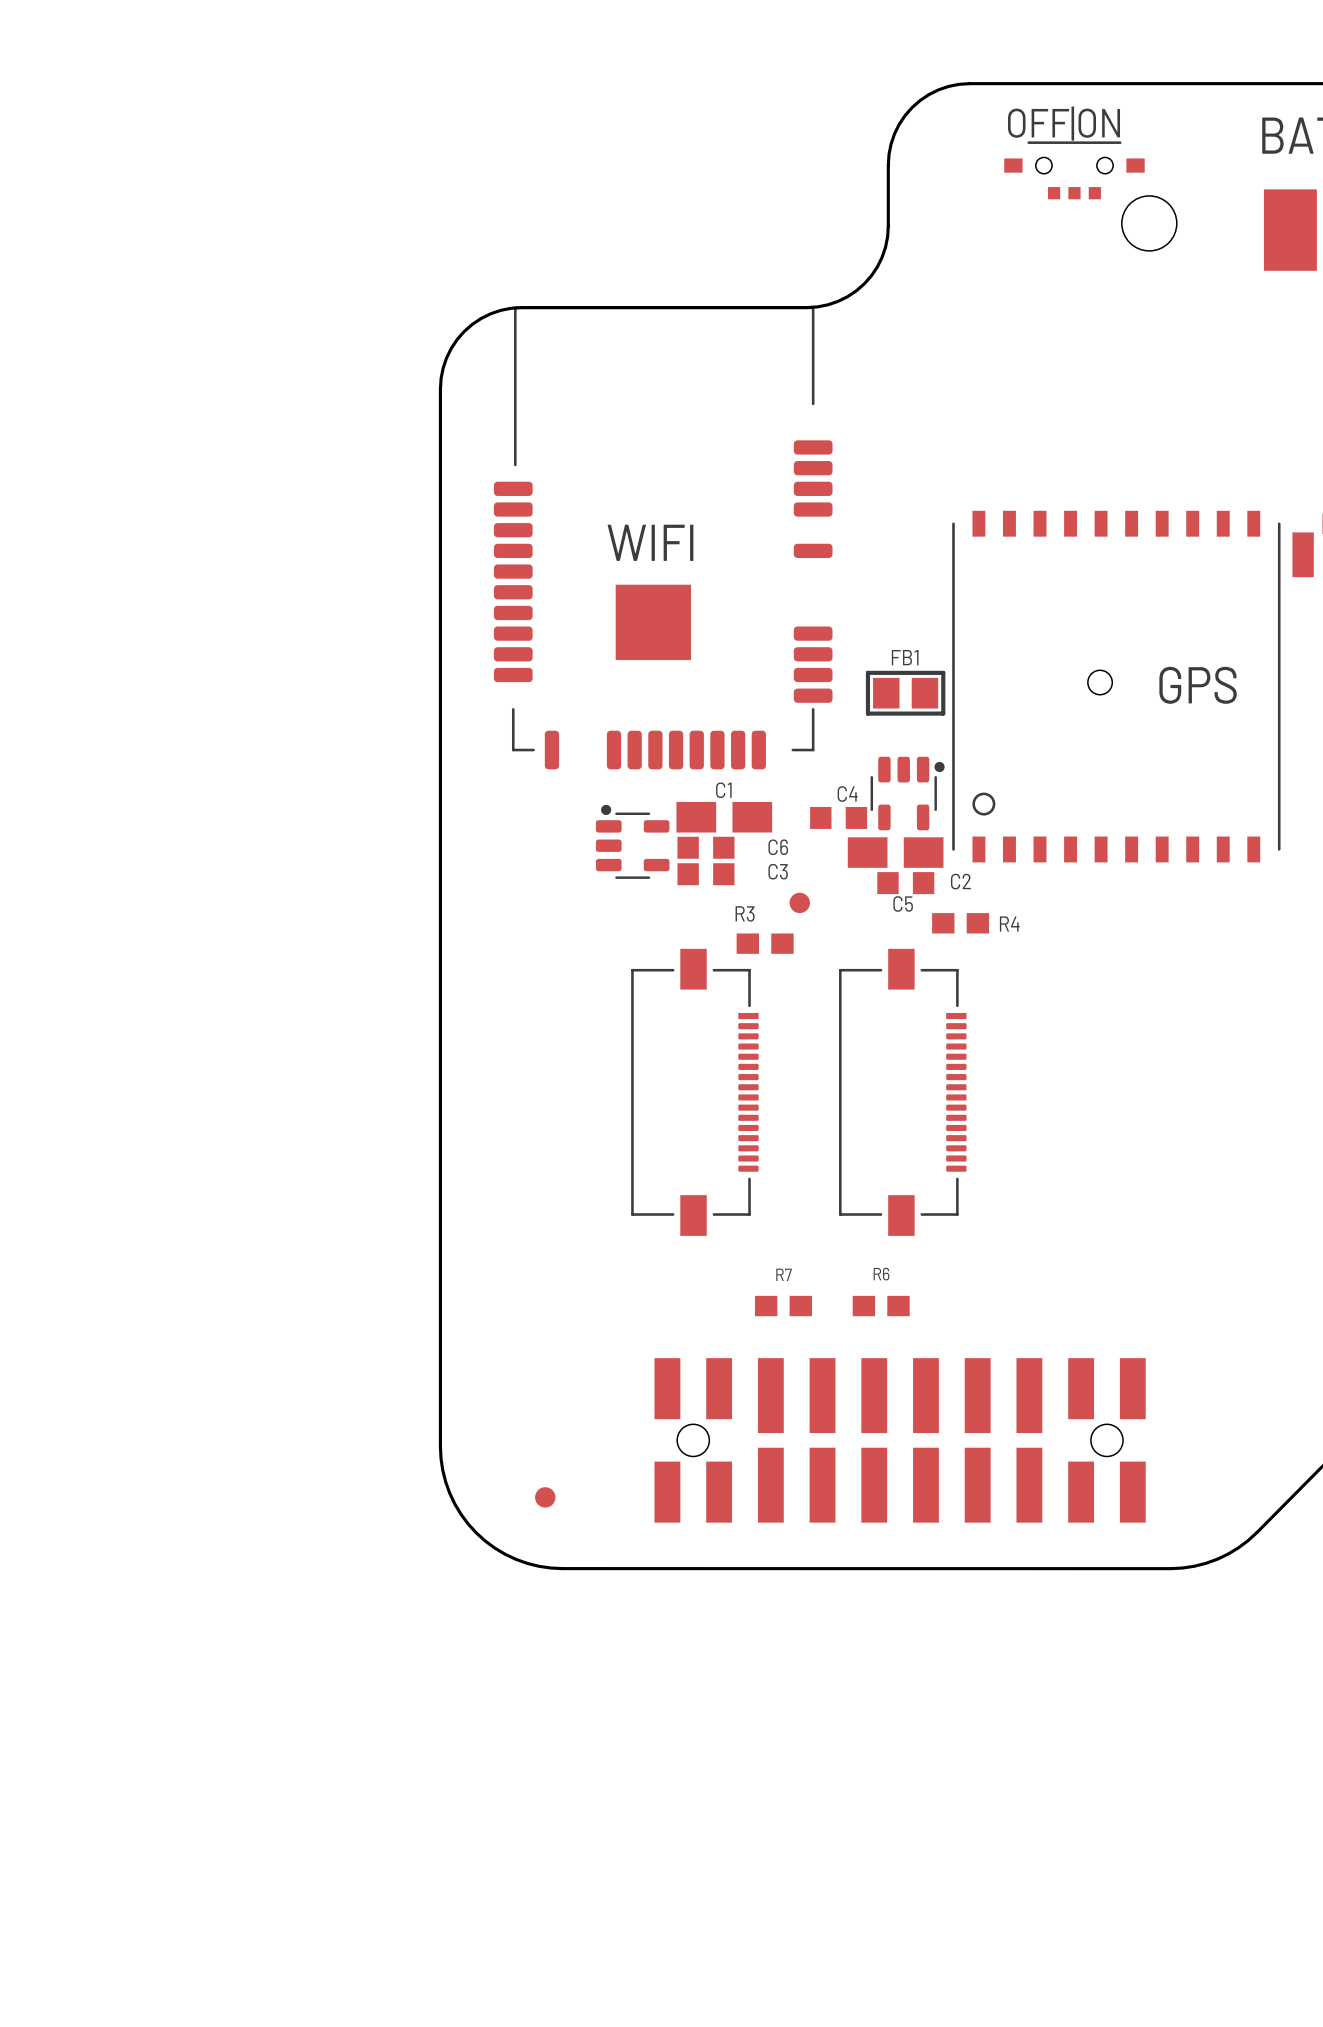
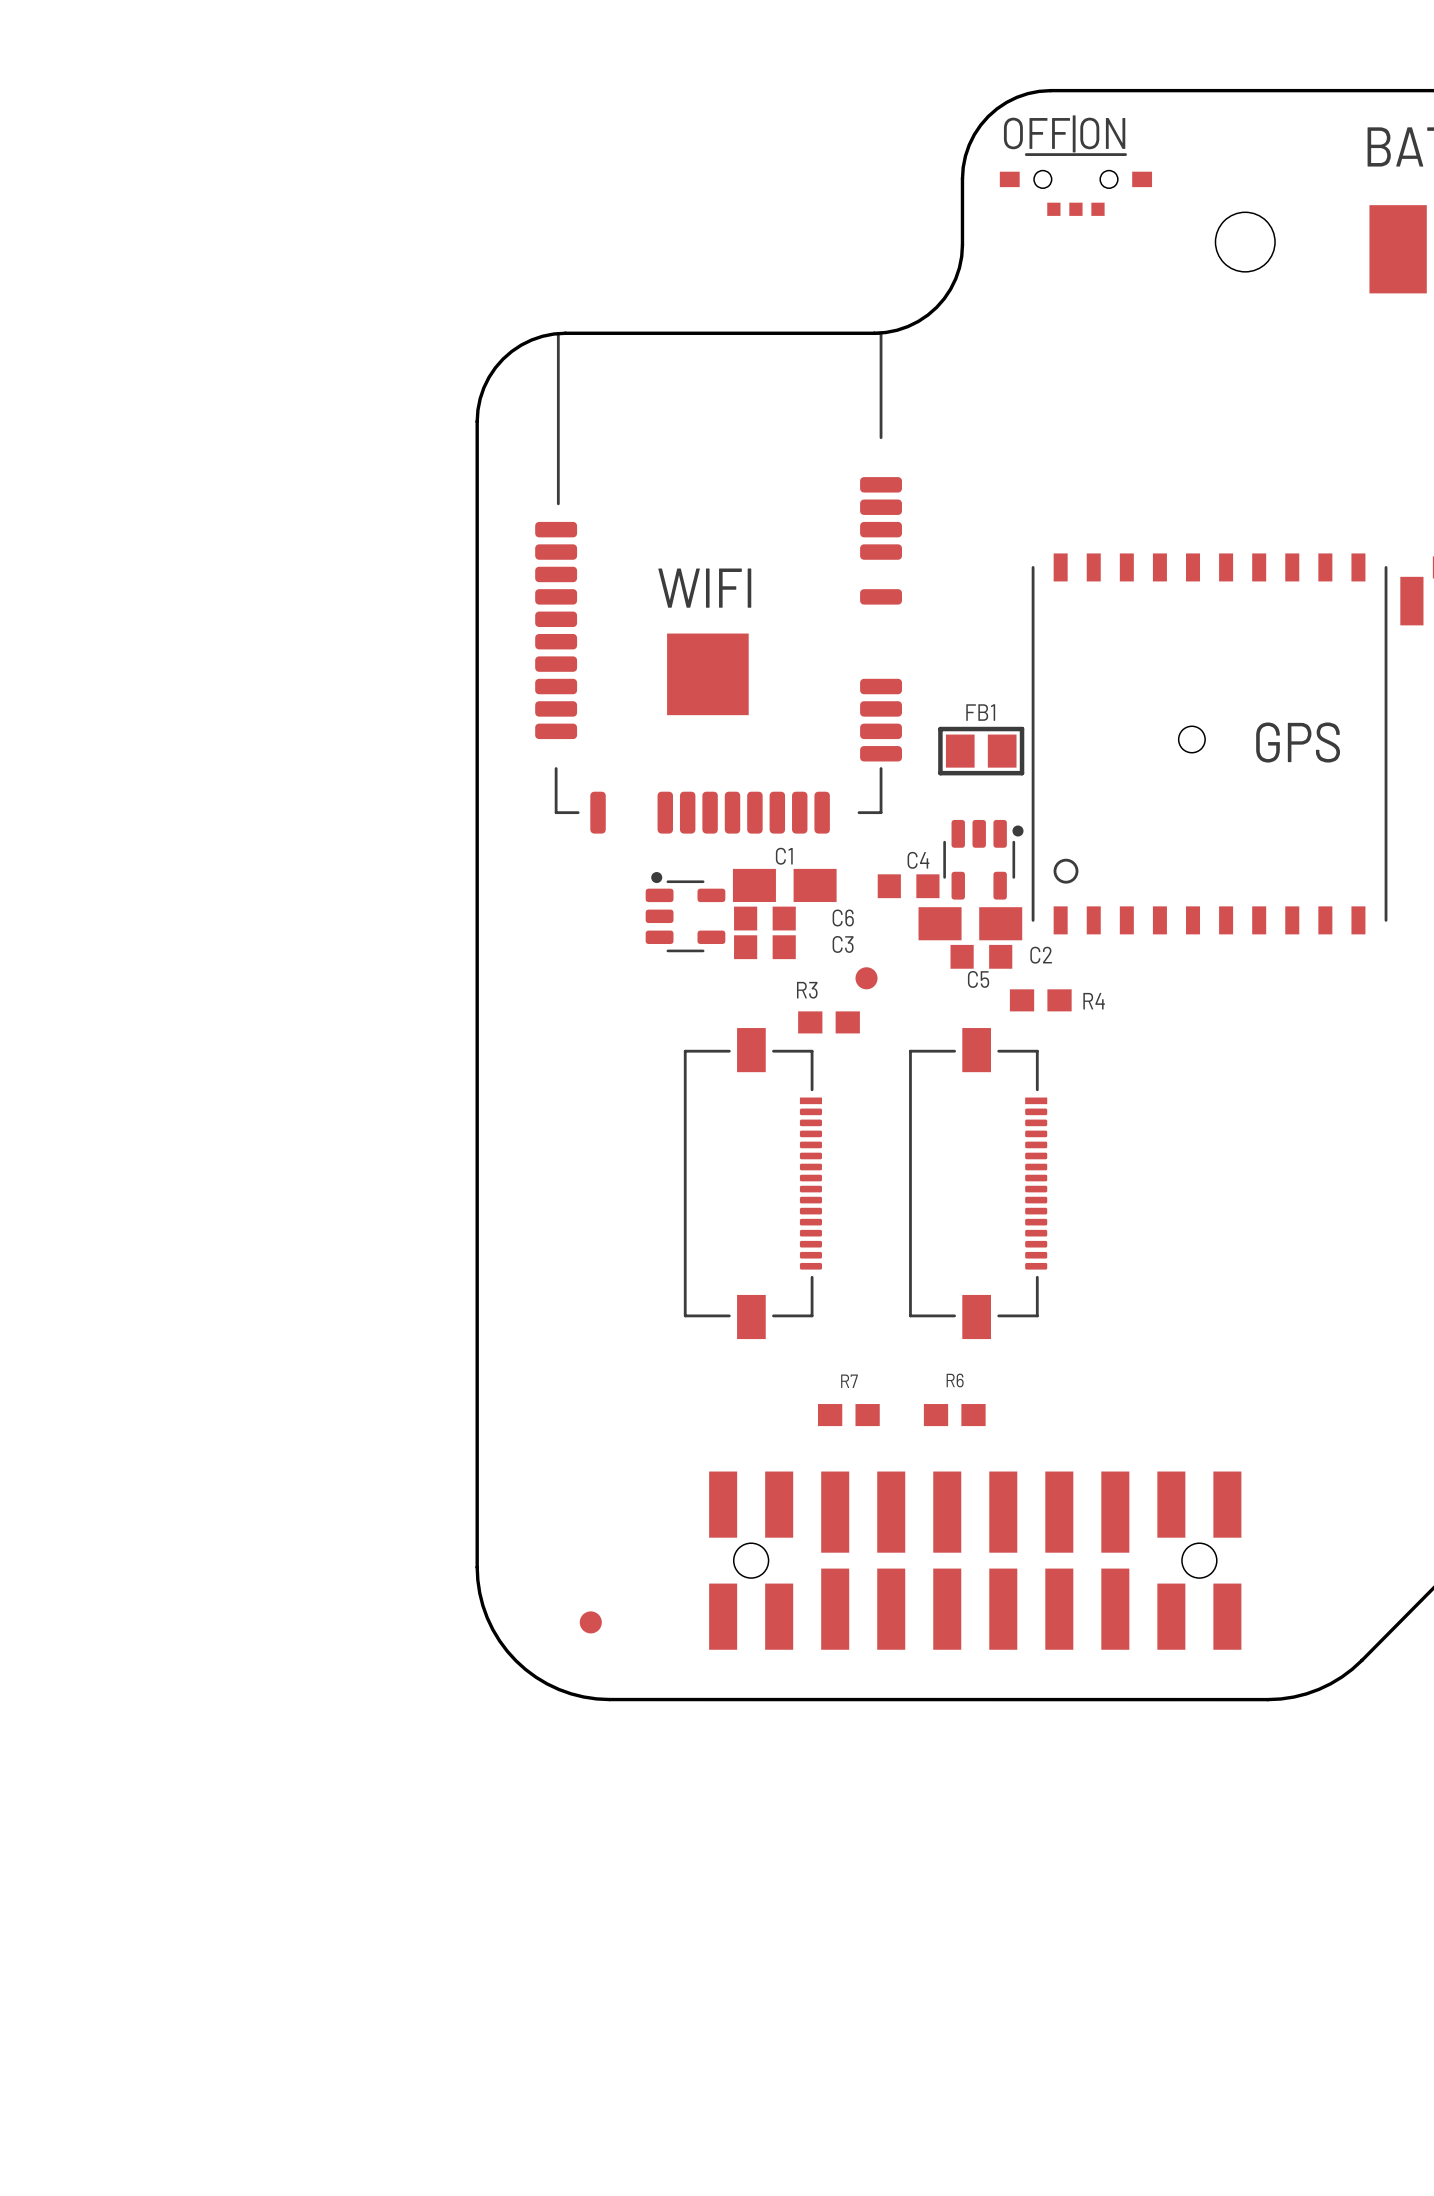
text position: OFF|ON (1064, 123) -> OFF|ON (1064, 133)
part position: (1074, 170) -> (1075, 184)

